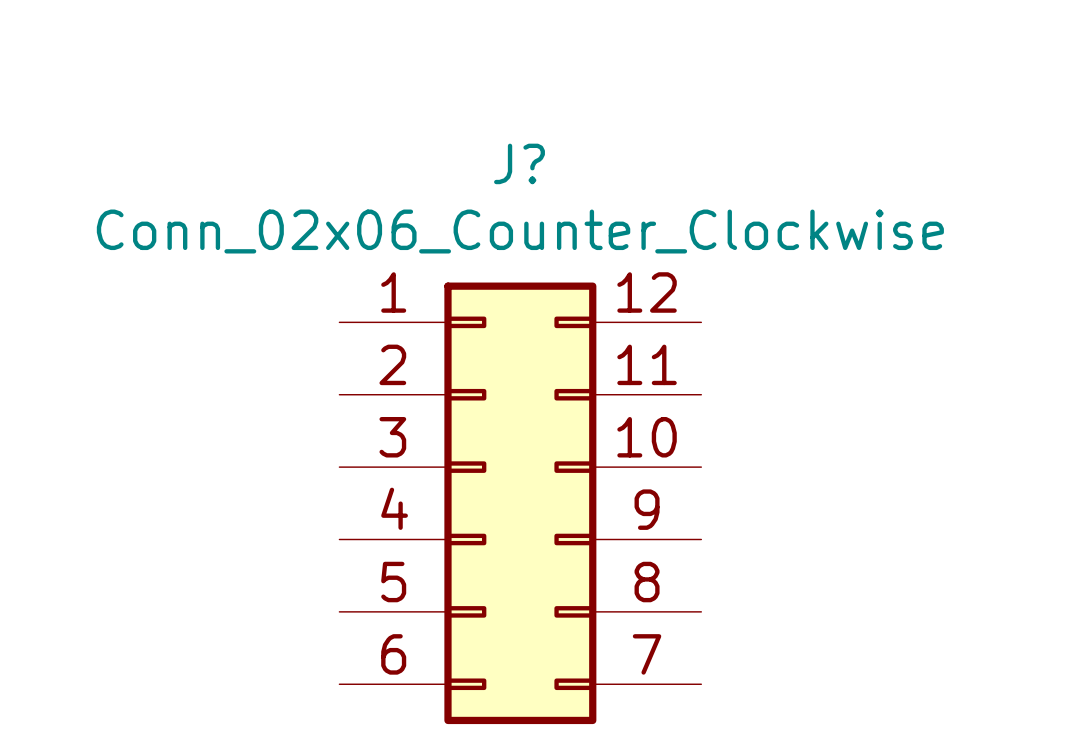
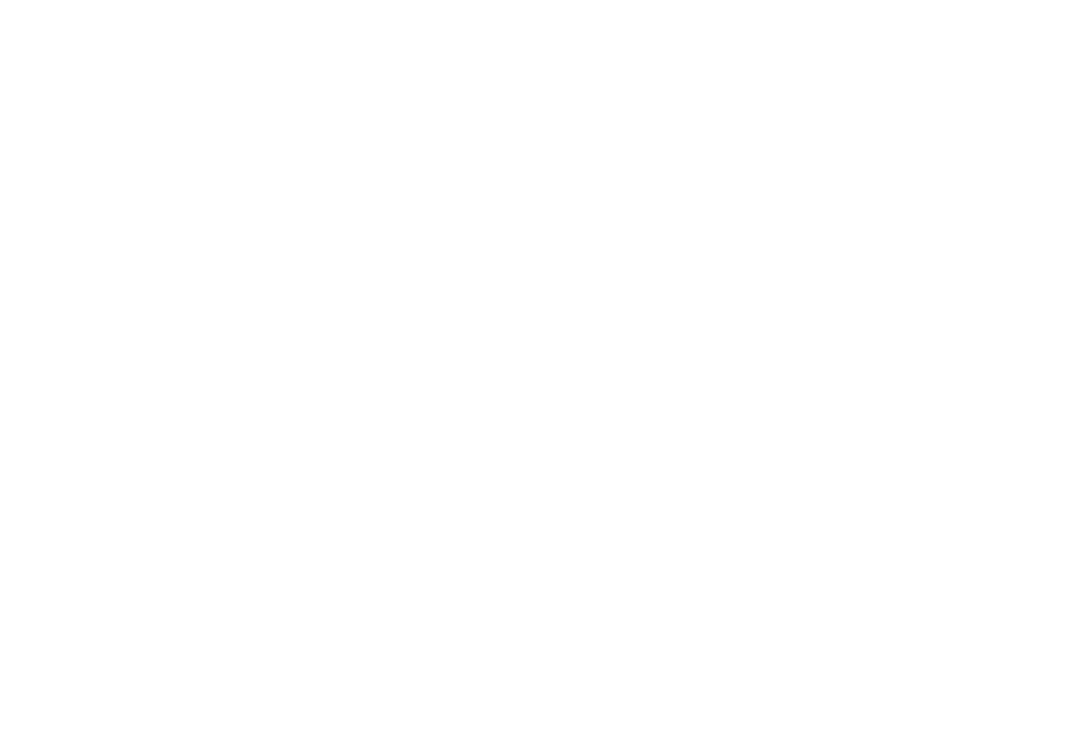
J?: Conn_02x06_Counter_Clockwise (520, 503) -> none

